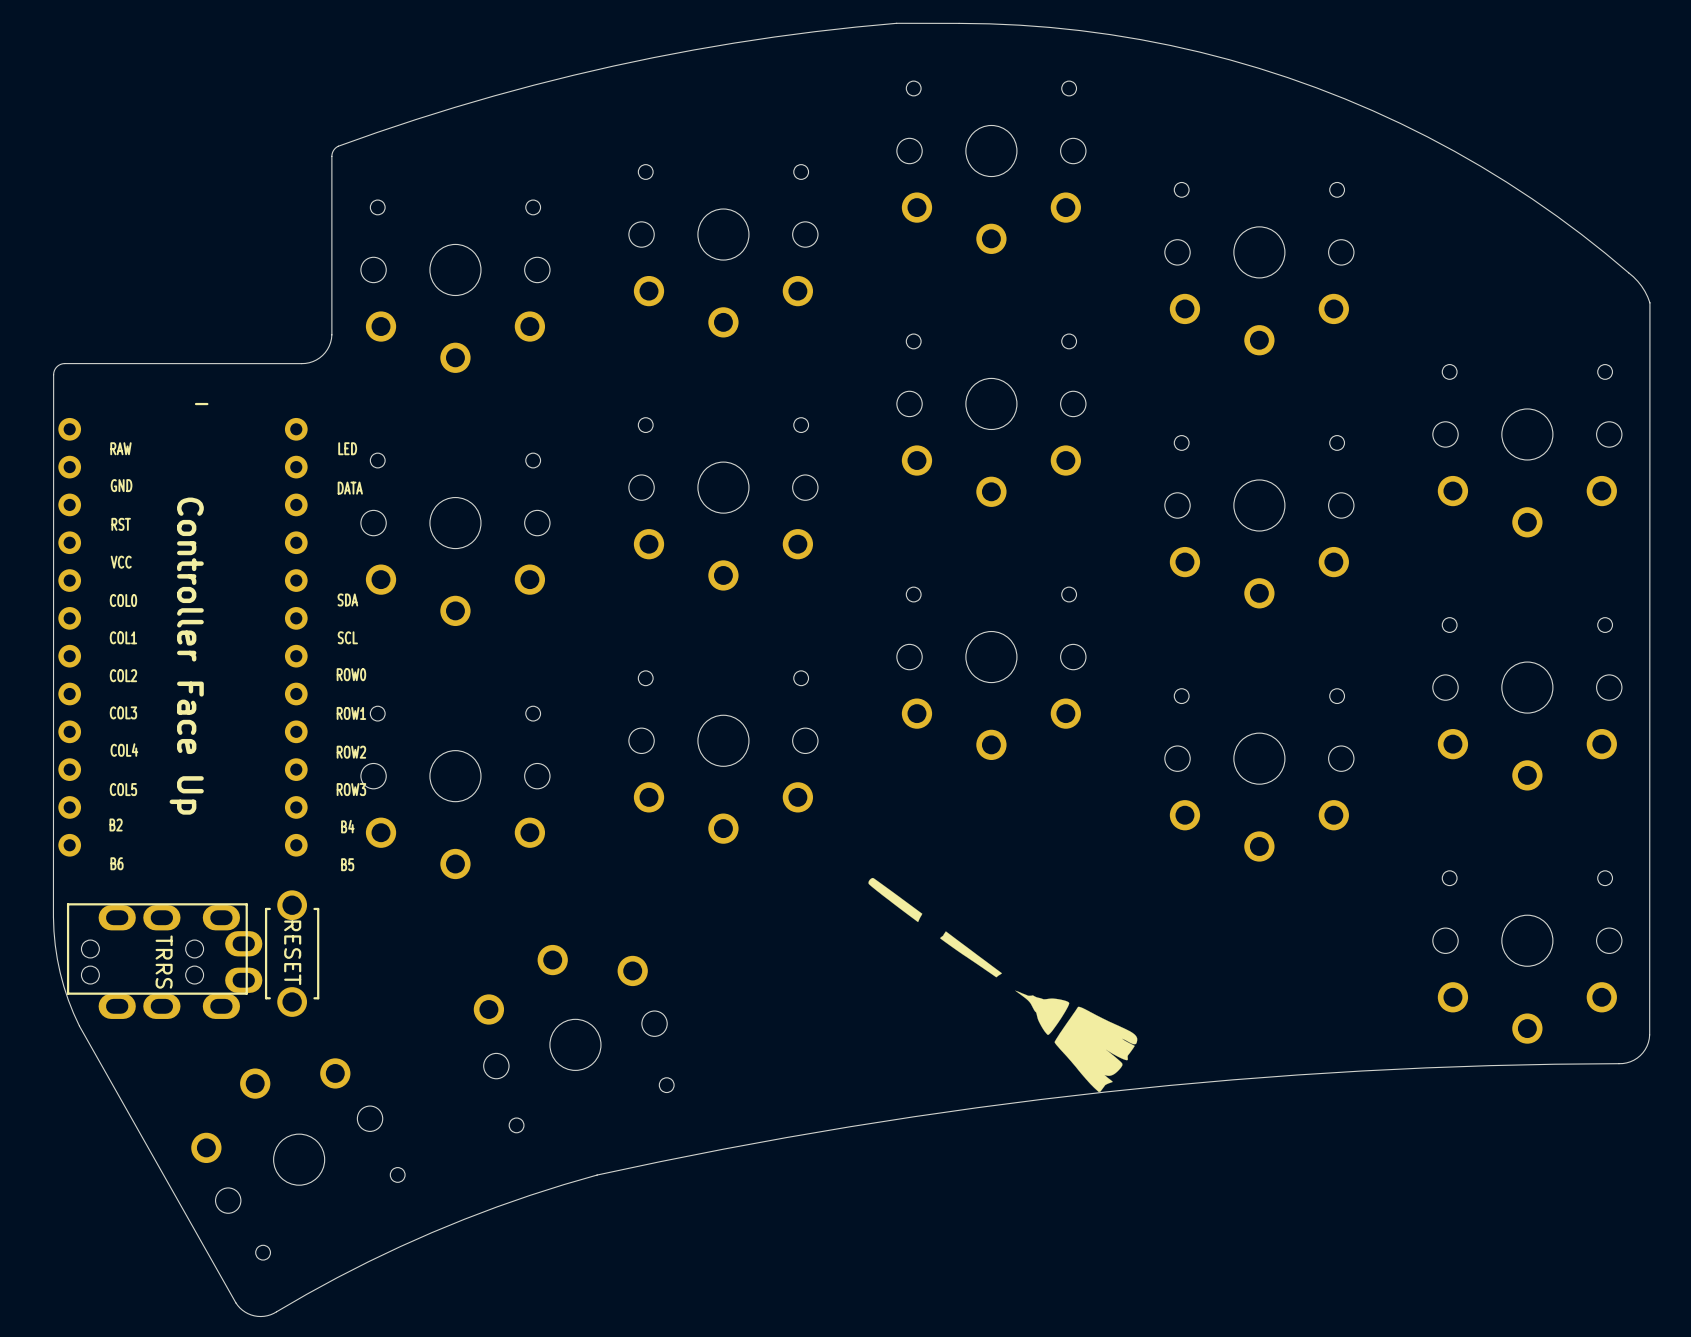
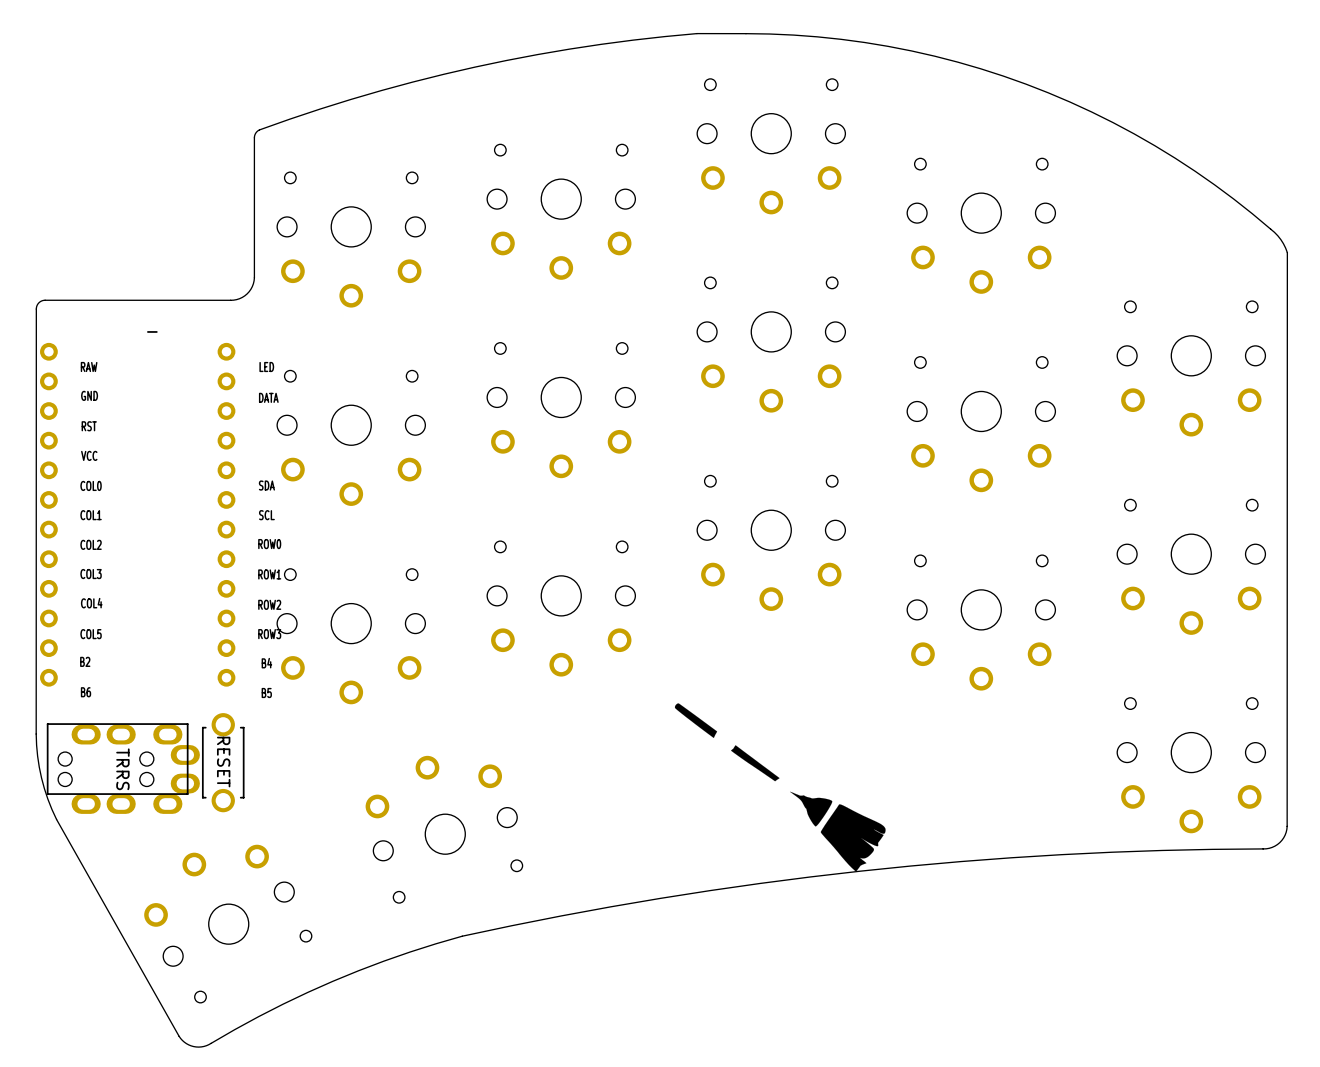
text: Controller Face Up (186, 656) -> none

